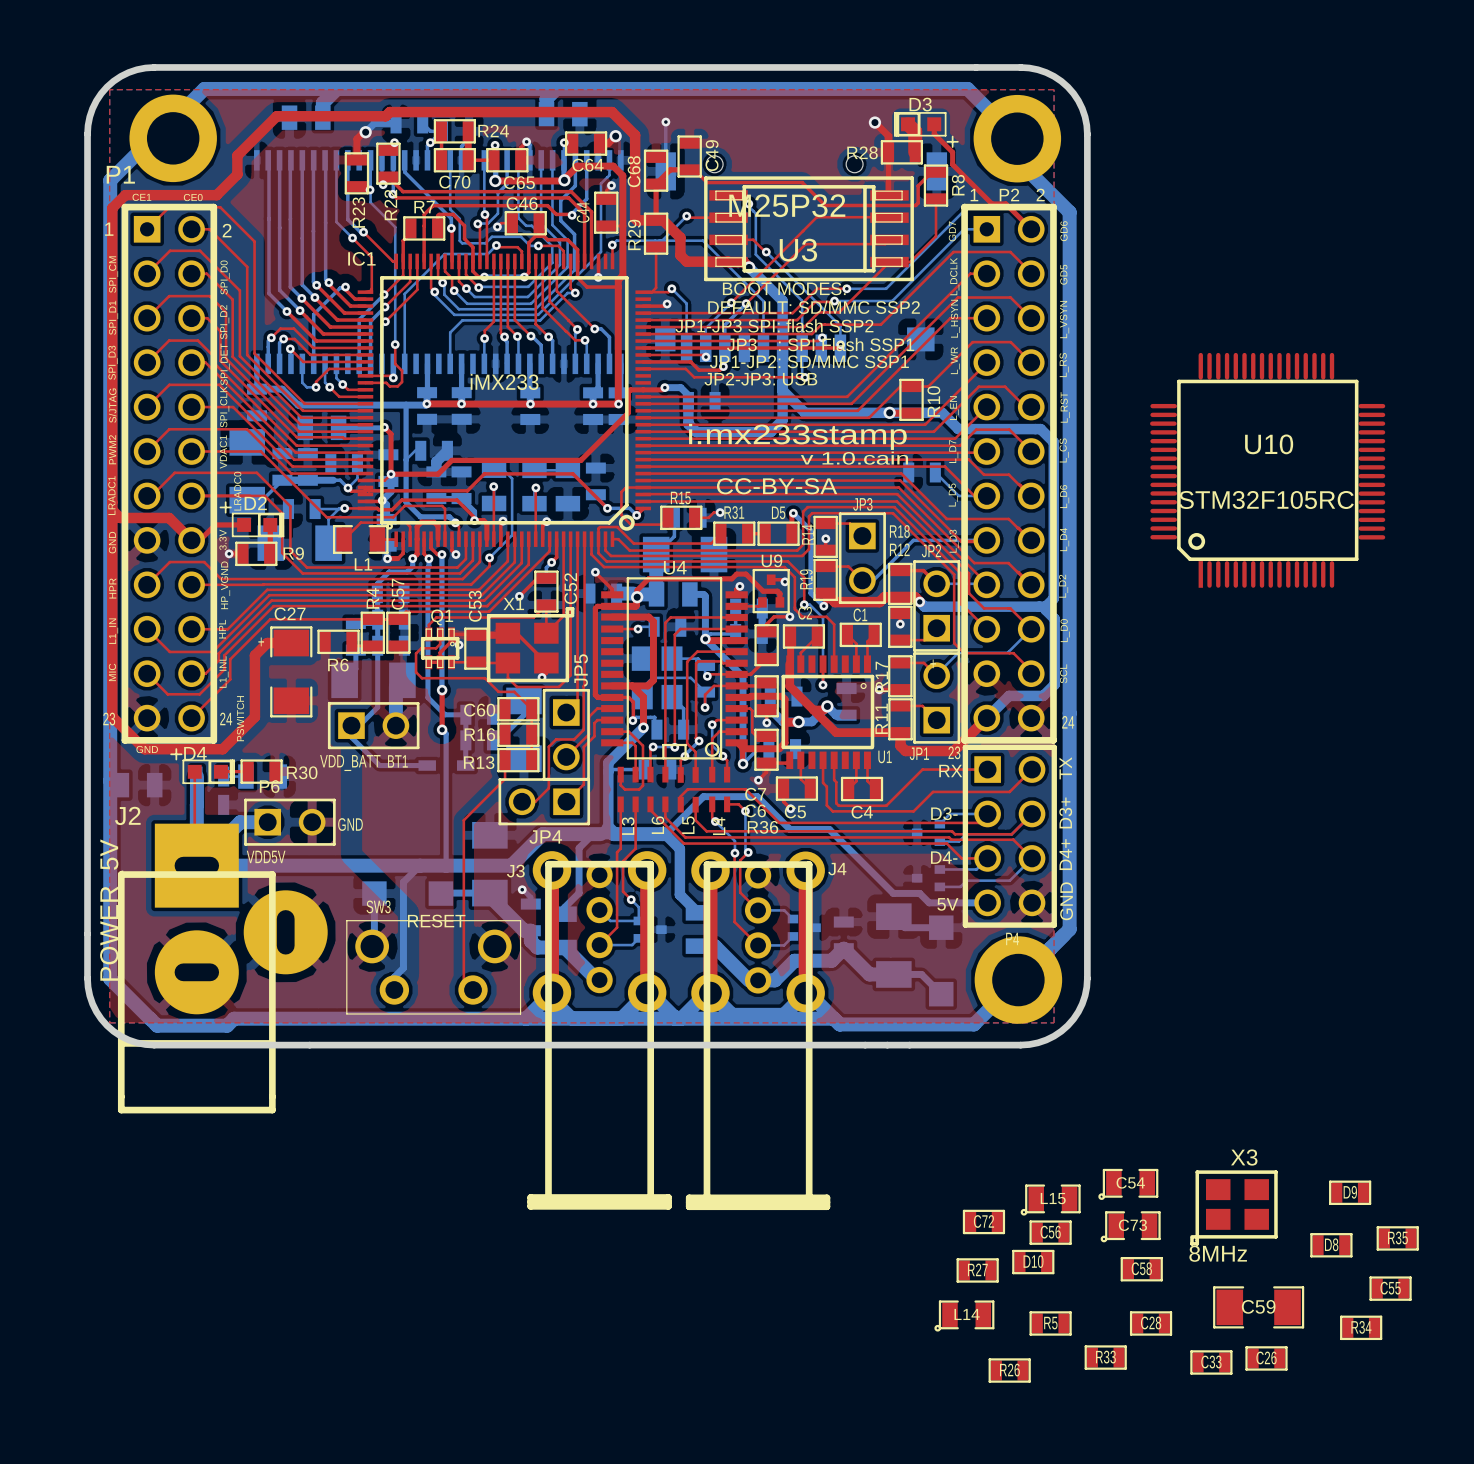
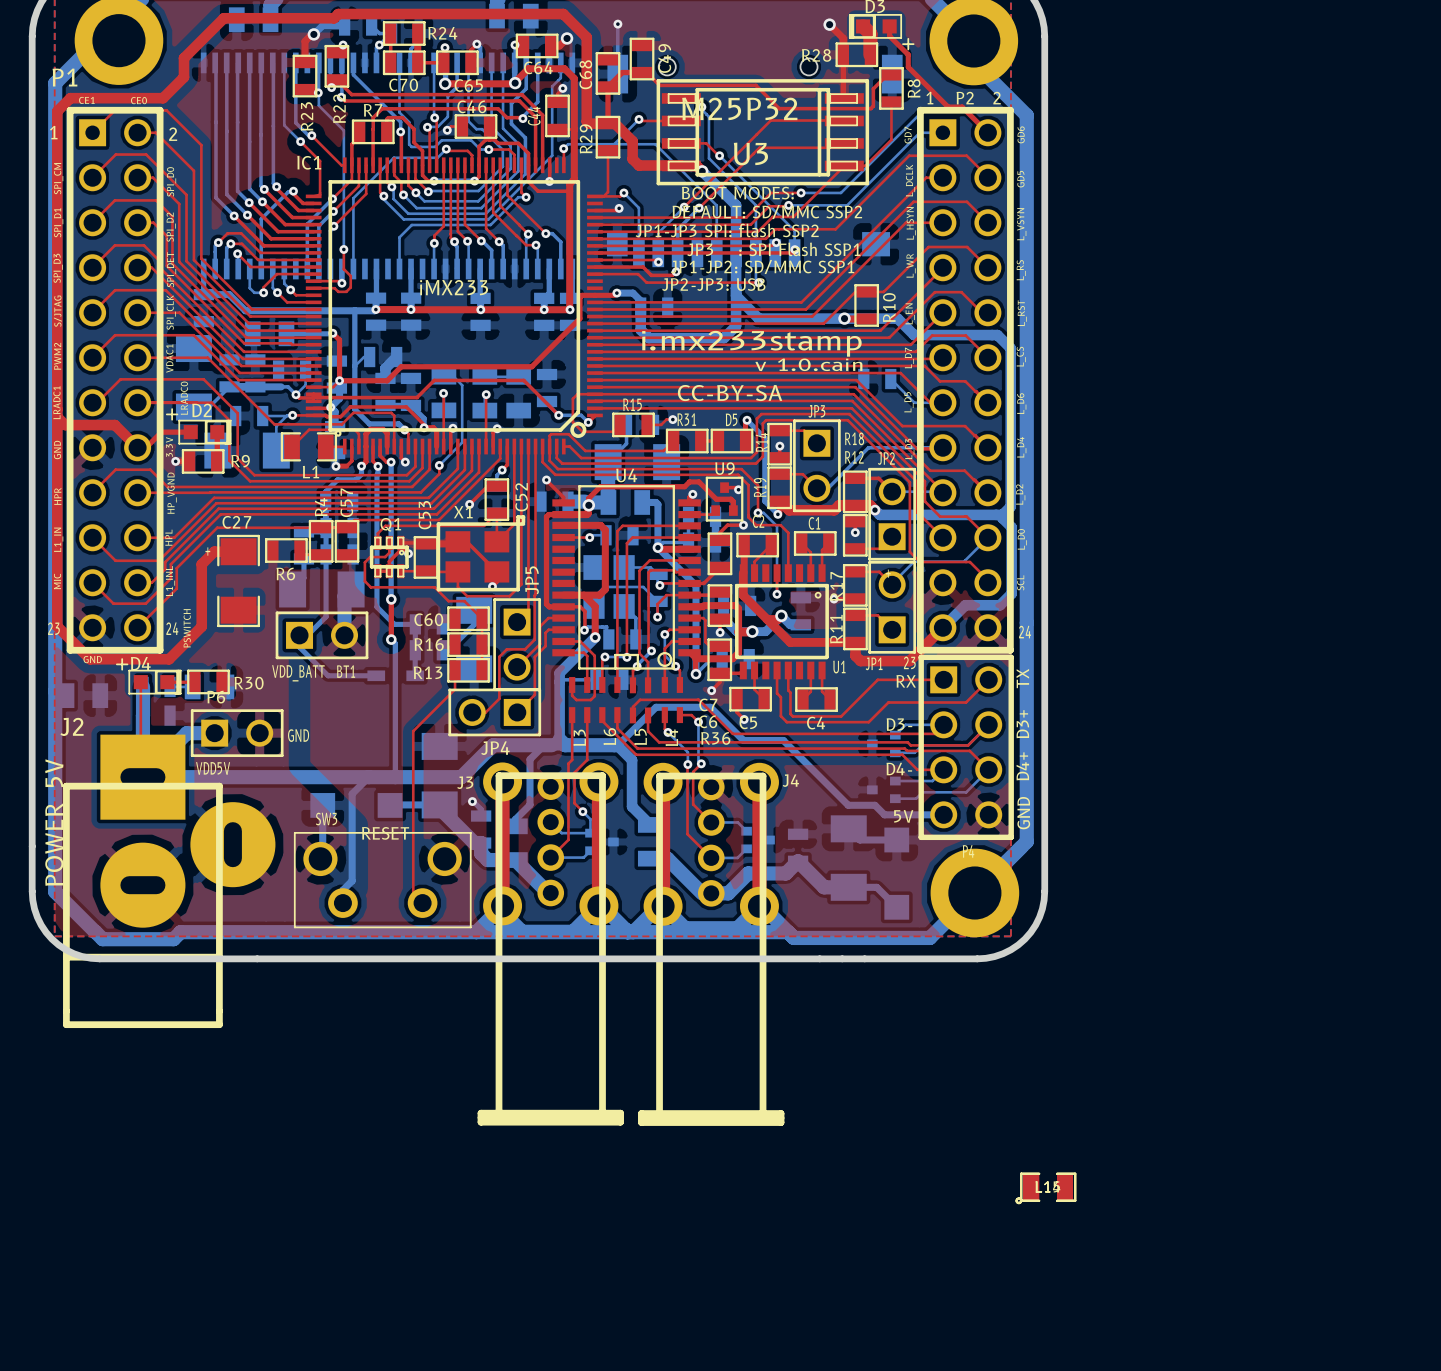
U10: STM32F105RC (1267, 470) -> none
C54: (1128, 1184) -> none
D9: (1350, 1192) -> none
L15 position: (1050, 1200) -> (1045, 1188)
X3: 8MHz (1233, 1207) -> none
C72: (983, 1221) -> none
C73: (1130, 1226) -> none
C56: (1050, 1232) -> none
R35: (1397, 1238) -> none
D8: (1331, 1245) -> none
D10: (1033, 1262) -> none
C58: (1141, 1269) -> none
R27: (977, 1270) -> none
C55: (1390, 1288) -> none
C59: (1258, 1307) -> none
L14 position: (964, 1316) -> (1045, 1188)
R5: (1050, 1323) -> none
C28: (1151, 1323) -> none
R34: (1361, 1327) -> none
R33: (1105, 1357) -> none
C26: (1266, 1358) -> none
C33: (1211, 1362) -> none
R26: (1009, 1370) -> none

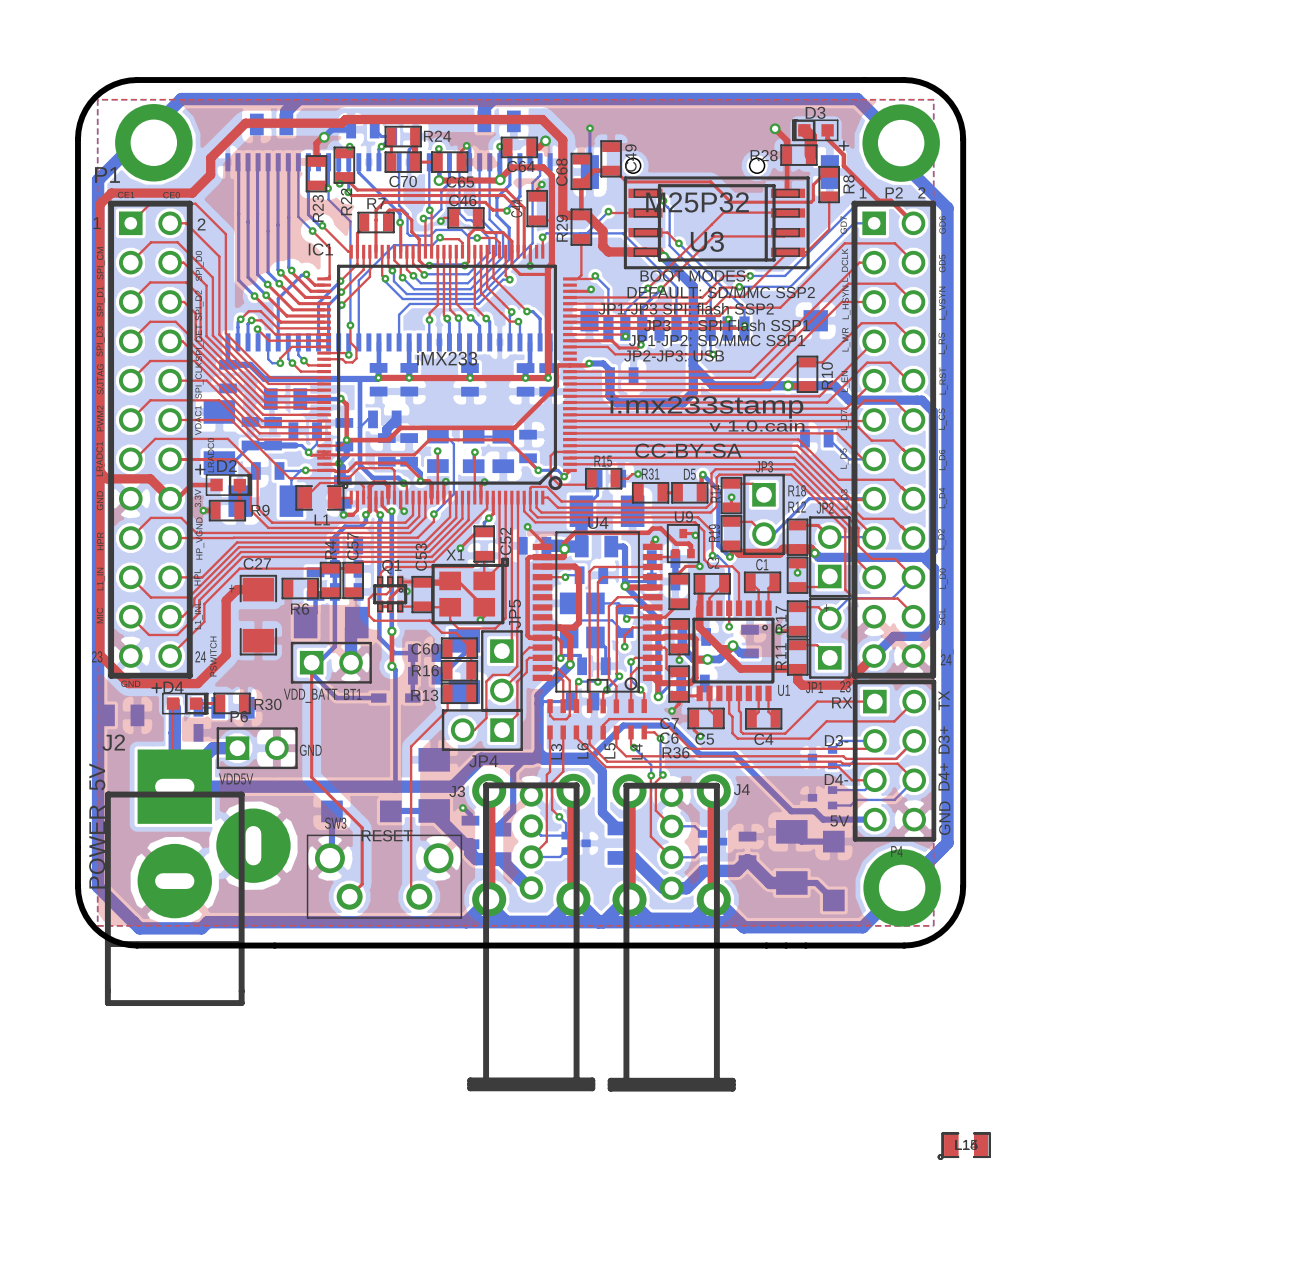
top track: none -> (311, 662) (311, 777) (362, 827) (362, 884) (349, 896)
bottom track: (368, 777) (352, 793) (352, 880) (342, 890) (342, 903) -> none

